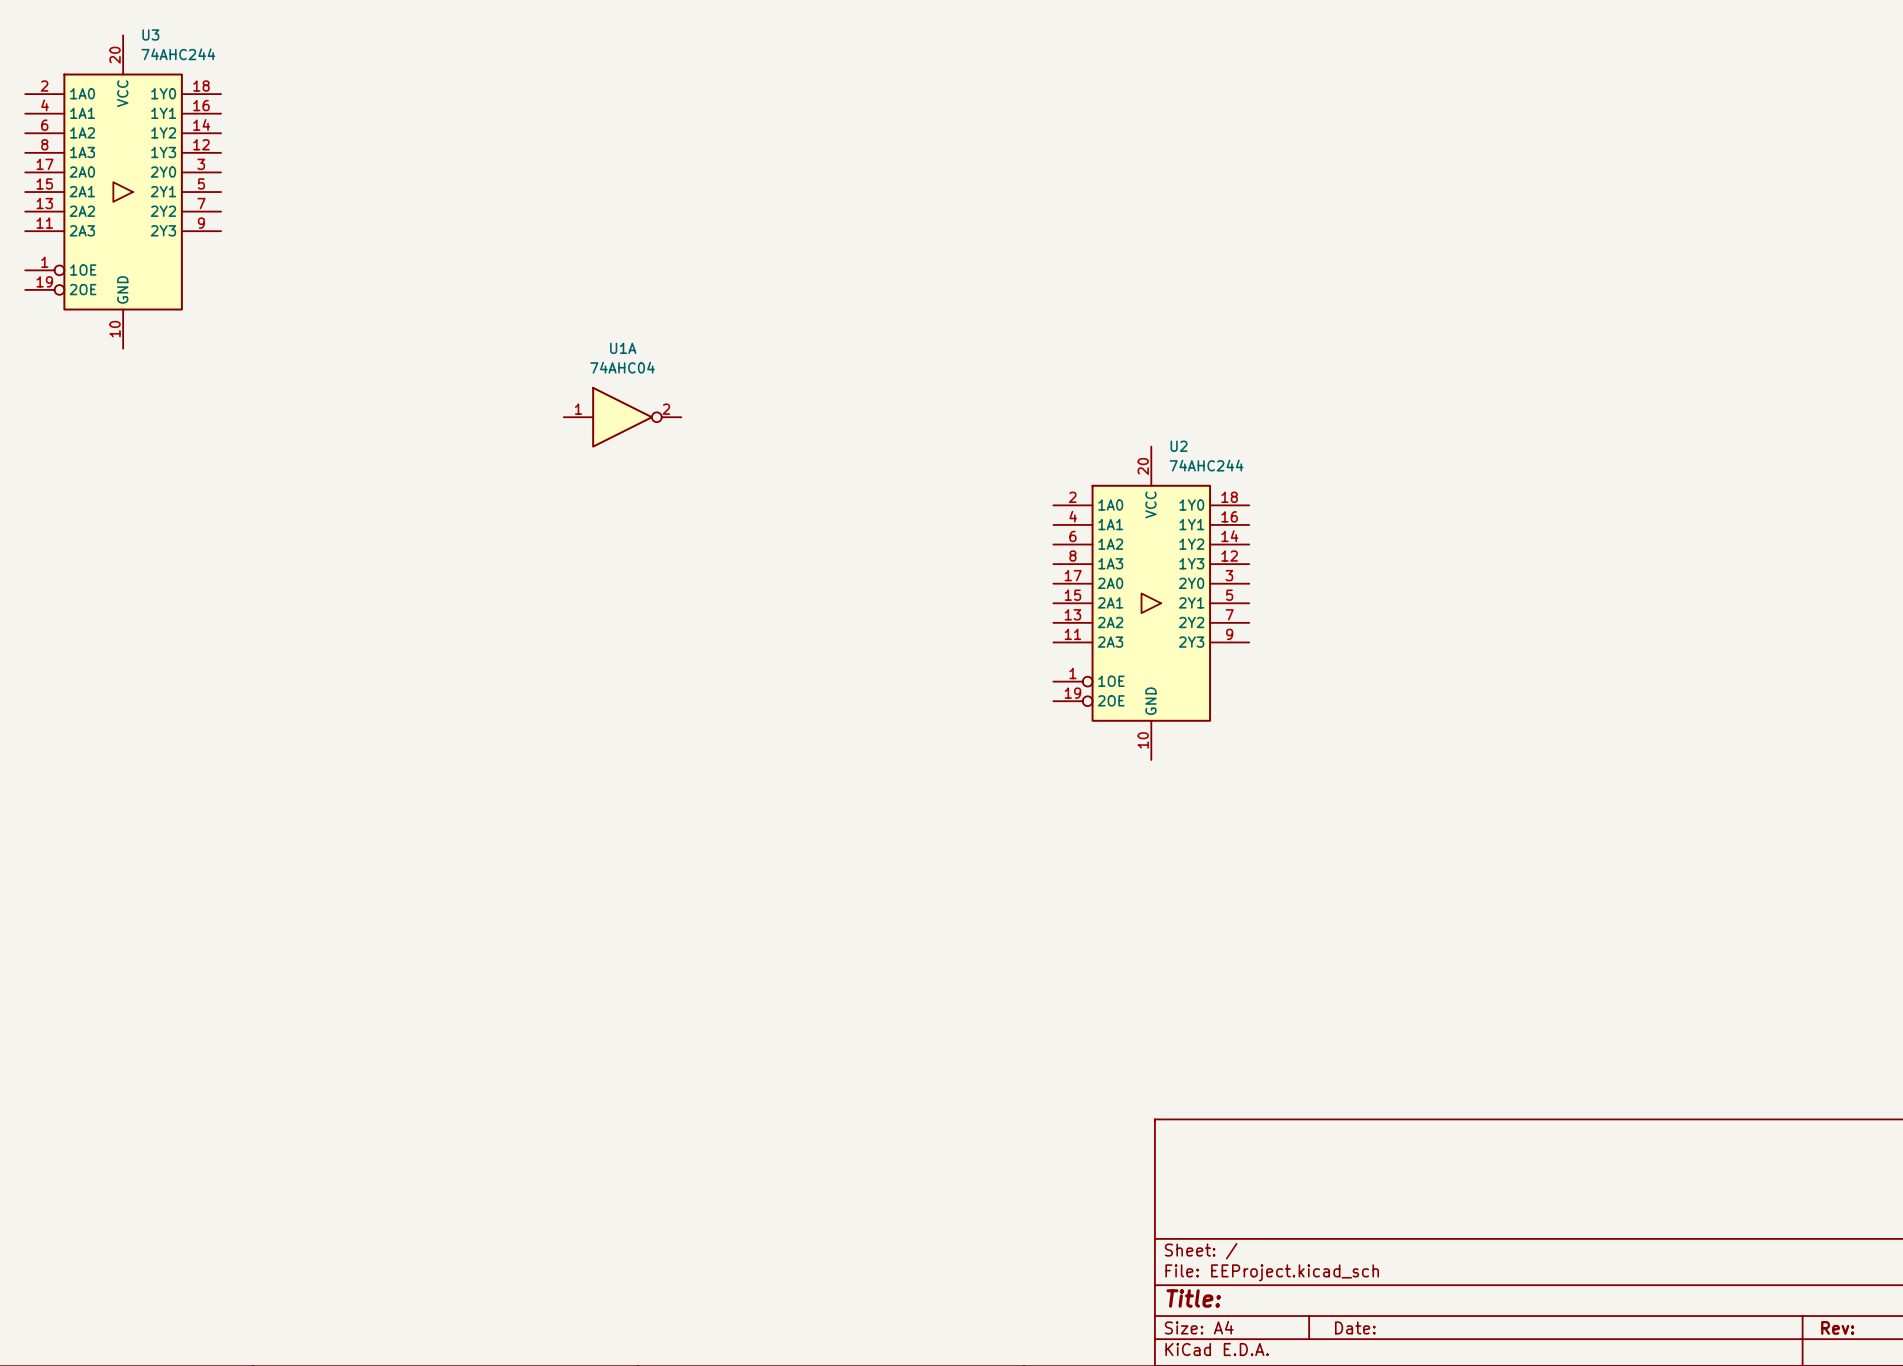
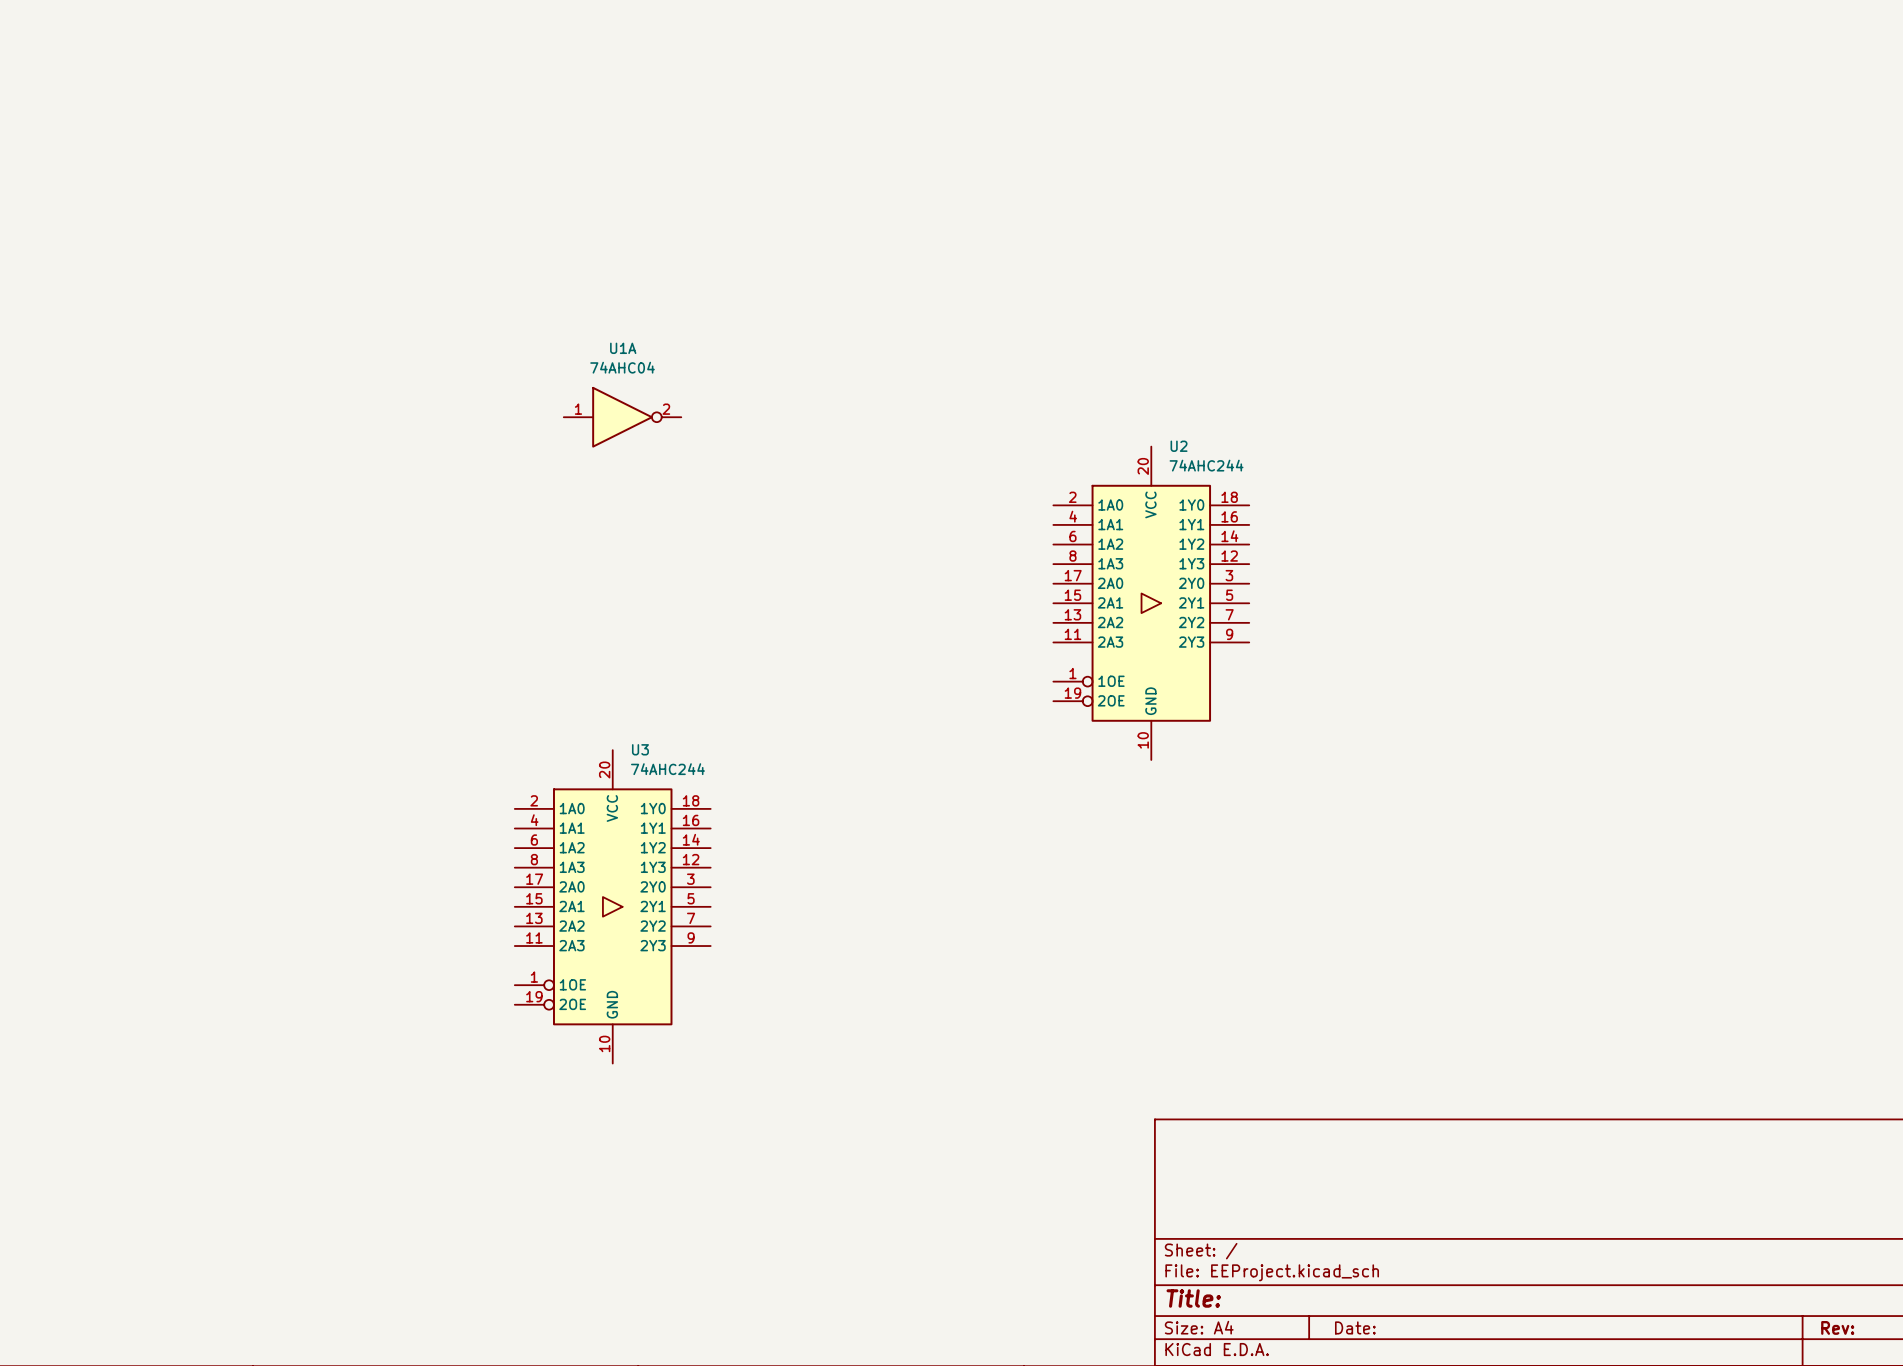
U3 position: (123, 192) -> (612, 906)

